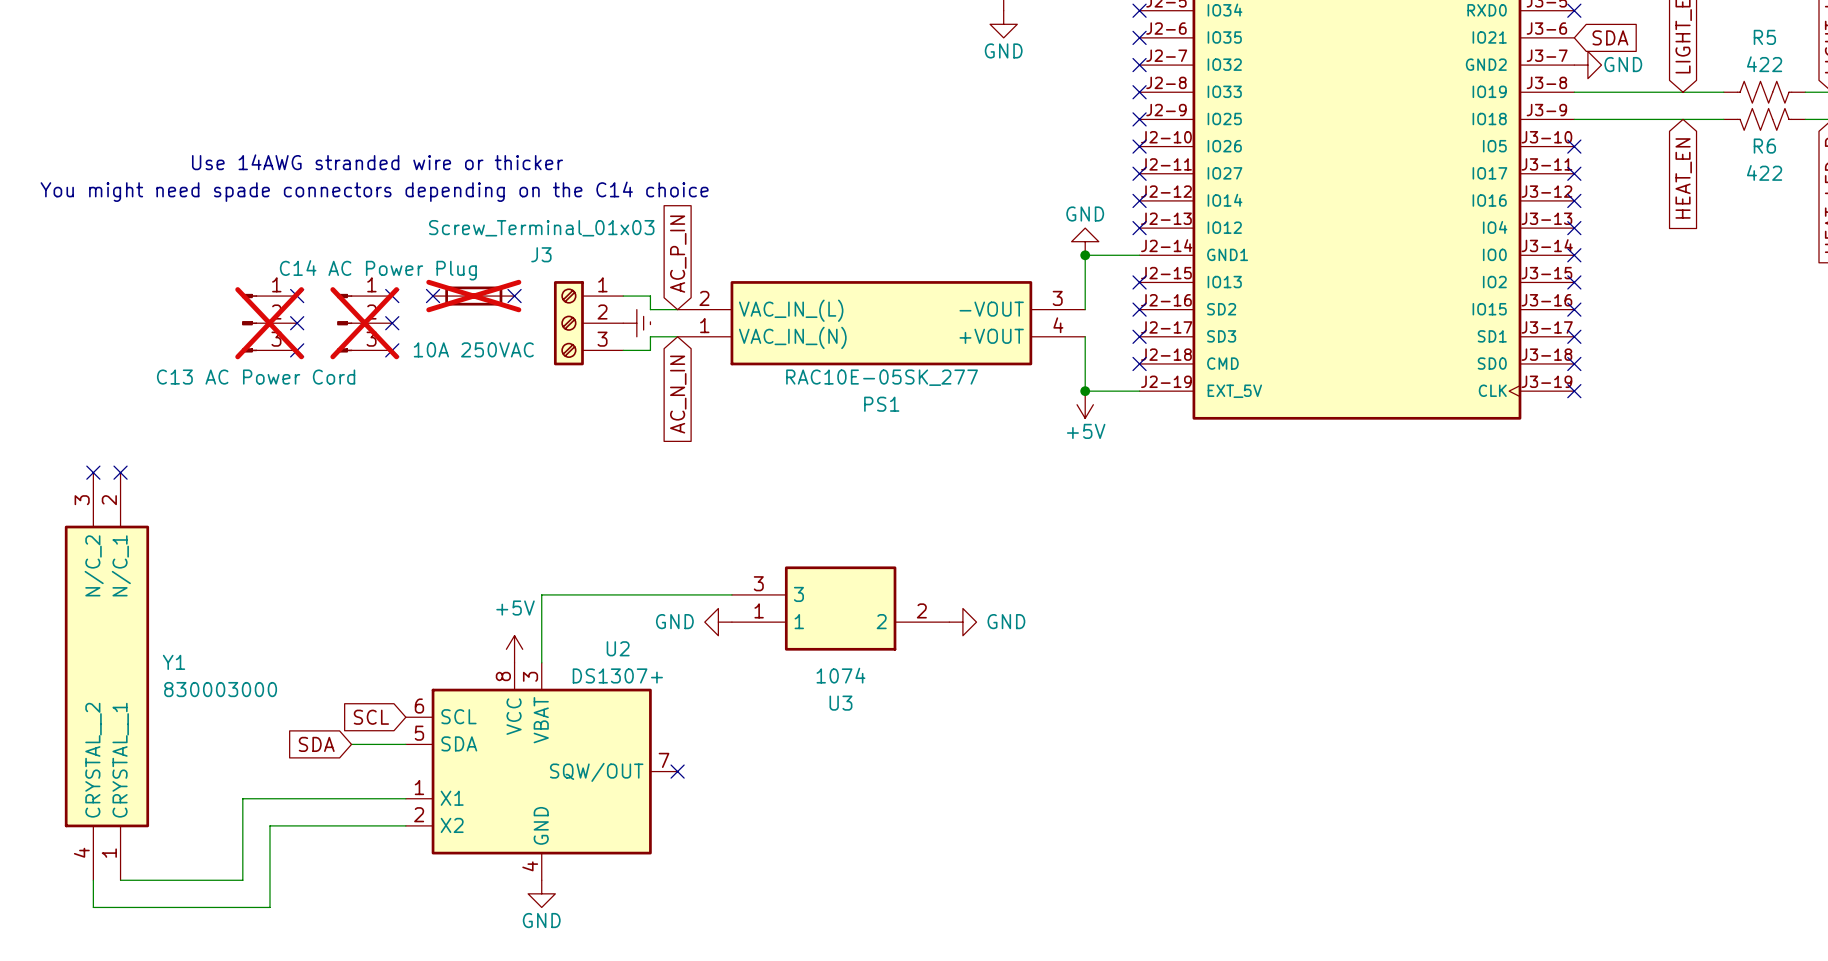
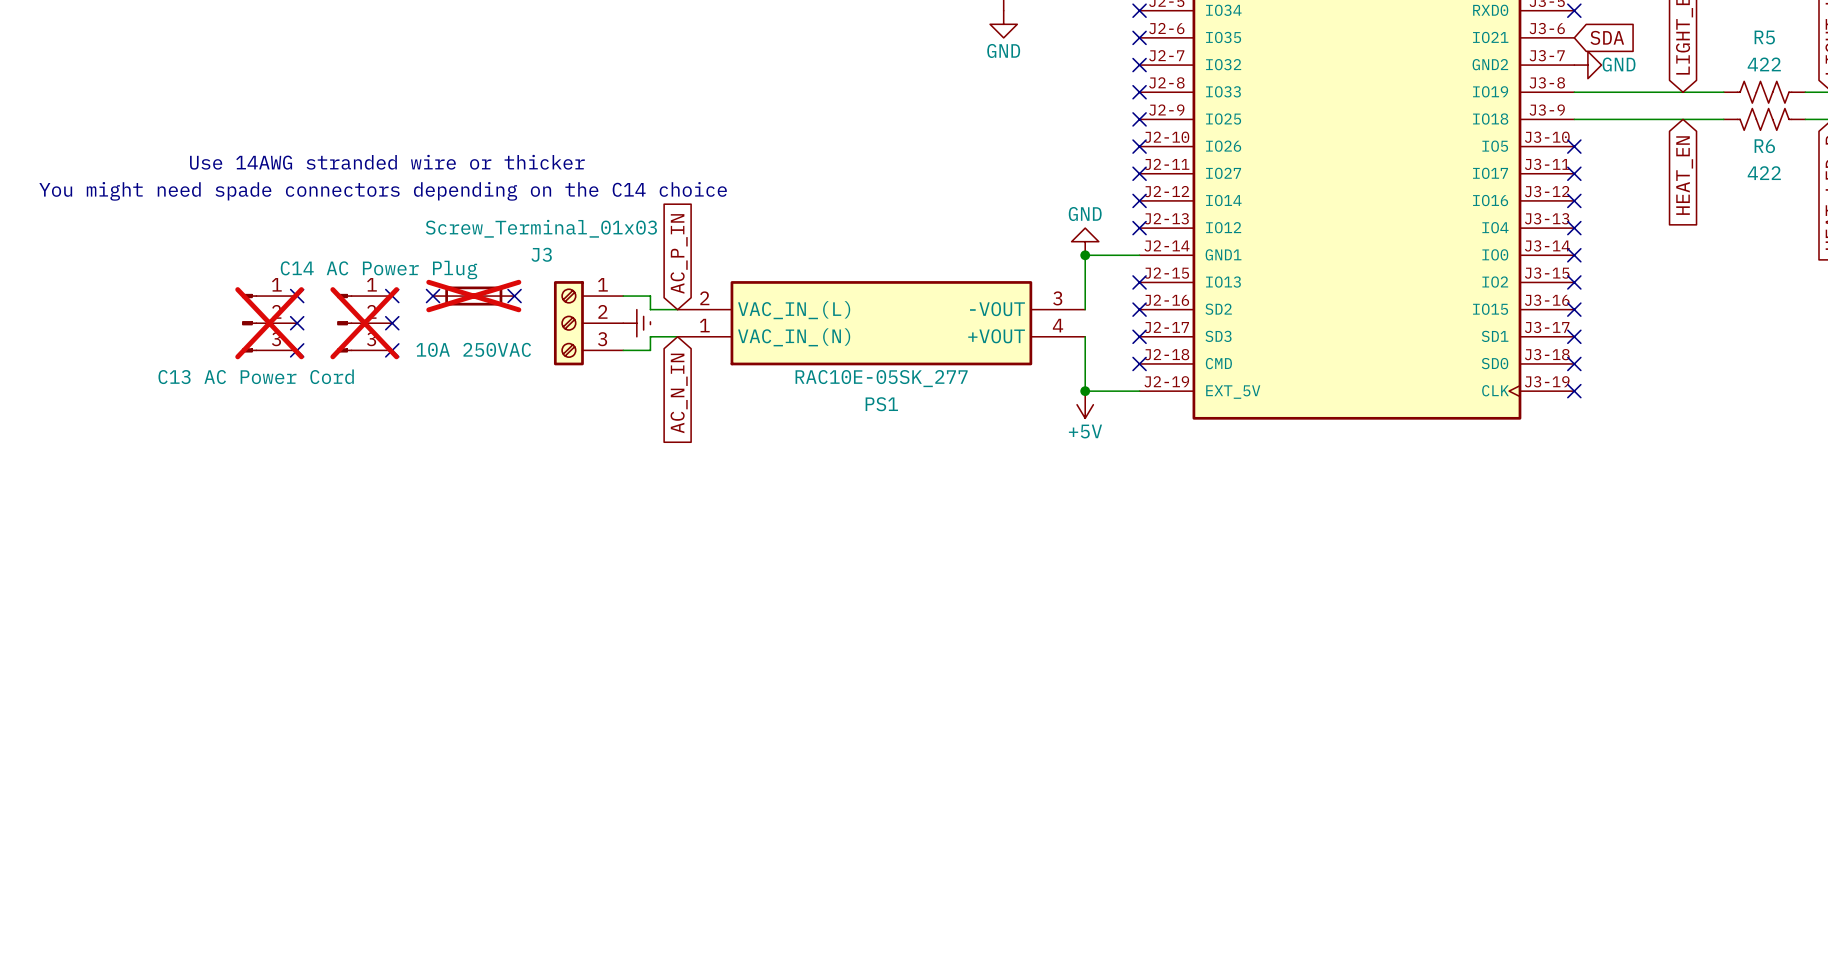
no-connect mark: (93, 472) -> none
no-connect mark: (120, 472) -> none
wire: (731, 594) (541, 594) (541, 662) -> none
U3: 1074 (840, 608) -> none
power symbol: GND (718, 622) -> none
power symbol: GND (962, 622) -> none
power symbol: +5V (514, 649) -> none
Y1: 830003000 (106, 676) -> none
global label: SCL (371, 717) -> none
global label: SDA (316, 744) -> none
wire: (351, 744) (405, 744) -> none
U2: DS1307+ (541, 771) -> none
no-connect mark: (677, 771) -> none
wire: (405, 798) (242, 798) (242, 880) (120, 880) -> none
wire: (405, 825) (269, 825) (269, 907) (93, 907) (93, 880) -> none
power symbol: GND (541, 893) -> none

